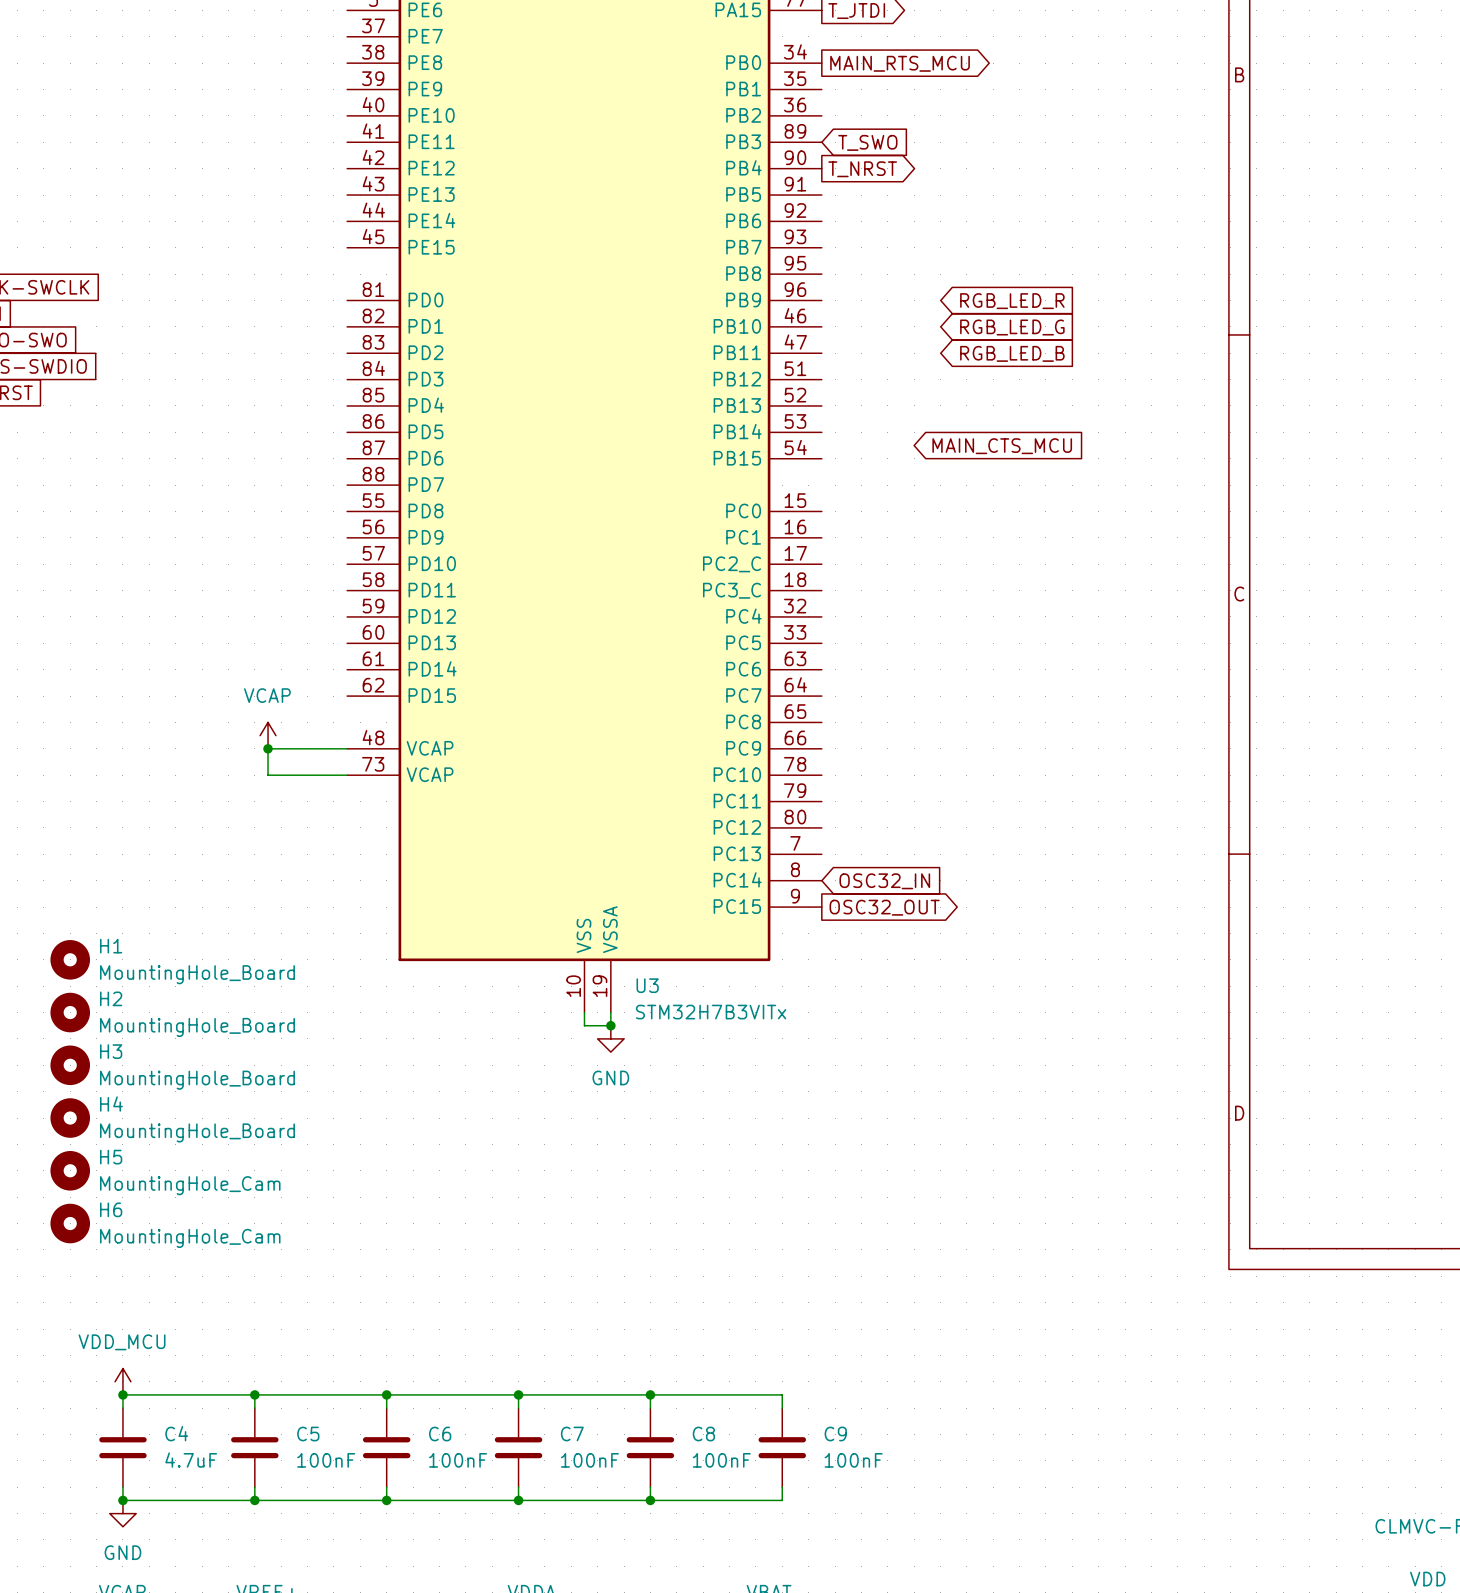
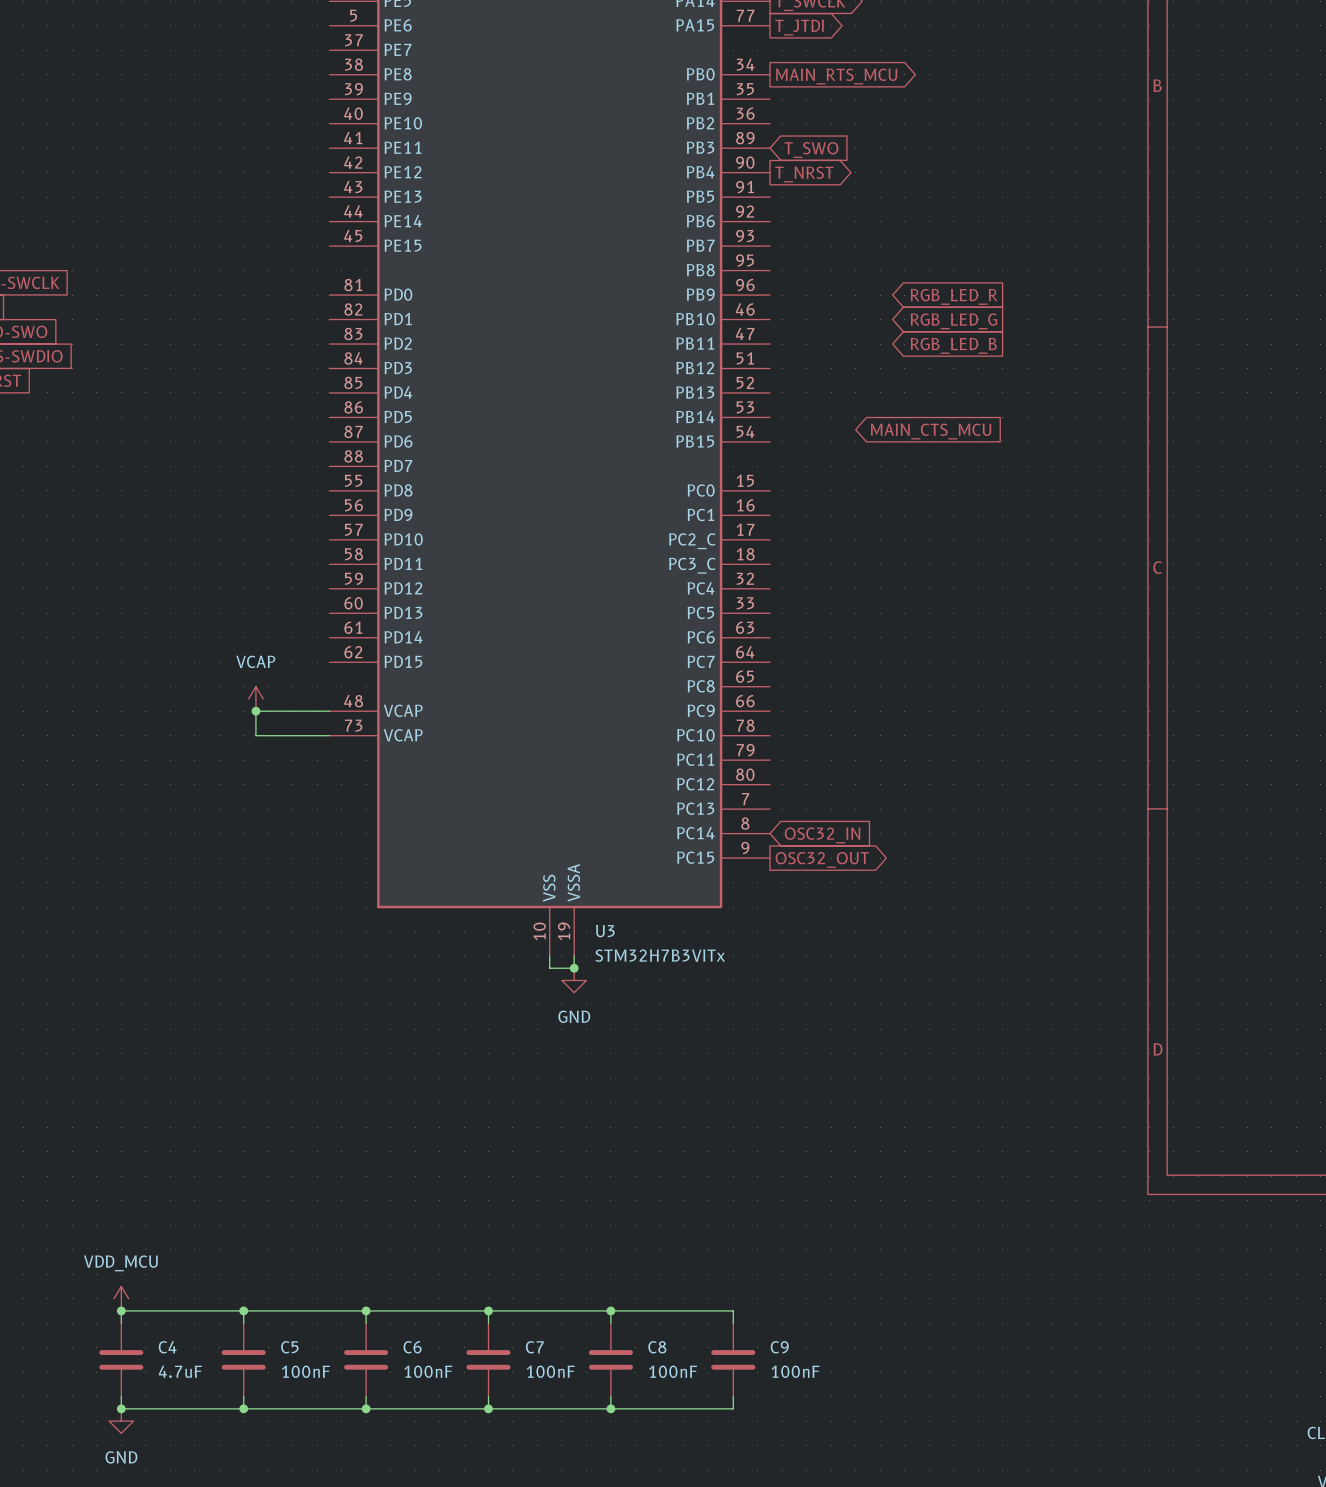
H1: MountingHole_Board (70, 959) -> none
H2: MountingHole_Board (70, 1012) -> none
H3: MountingHole_Board (70, 1065) -> none
H4: MountingHole_Board (70, 1118) -> none
H5: MountingHole_Cam (70, 1170) -> none
H6: MountingHole_Cam (70, 1223) -> none

